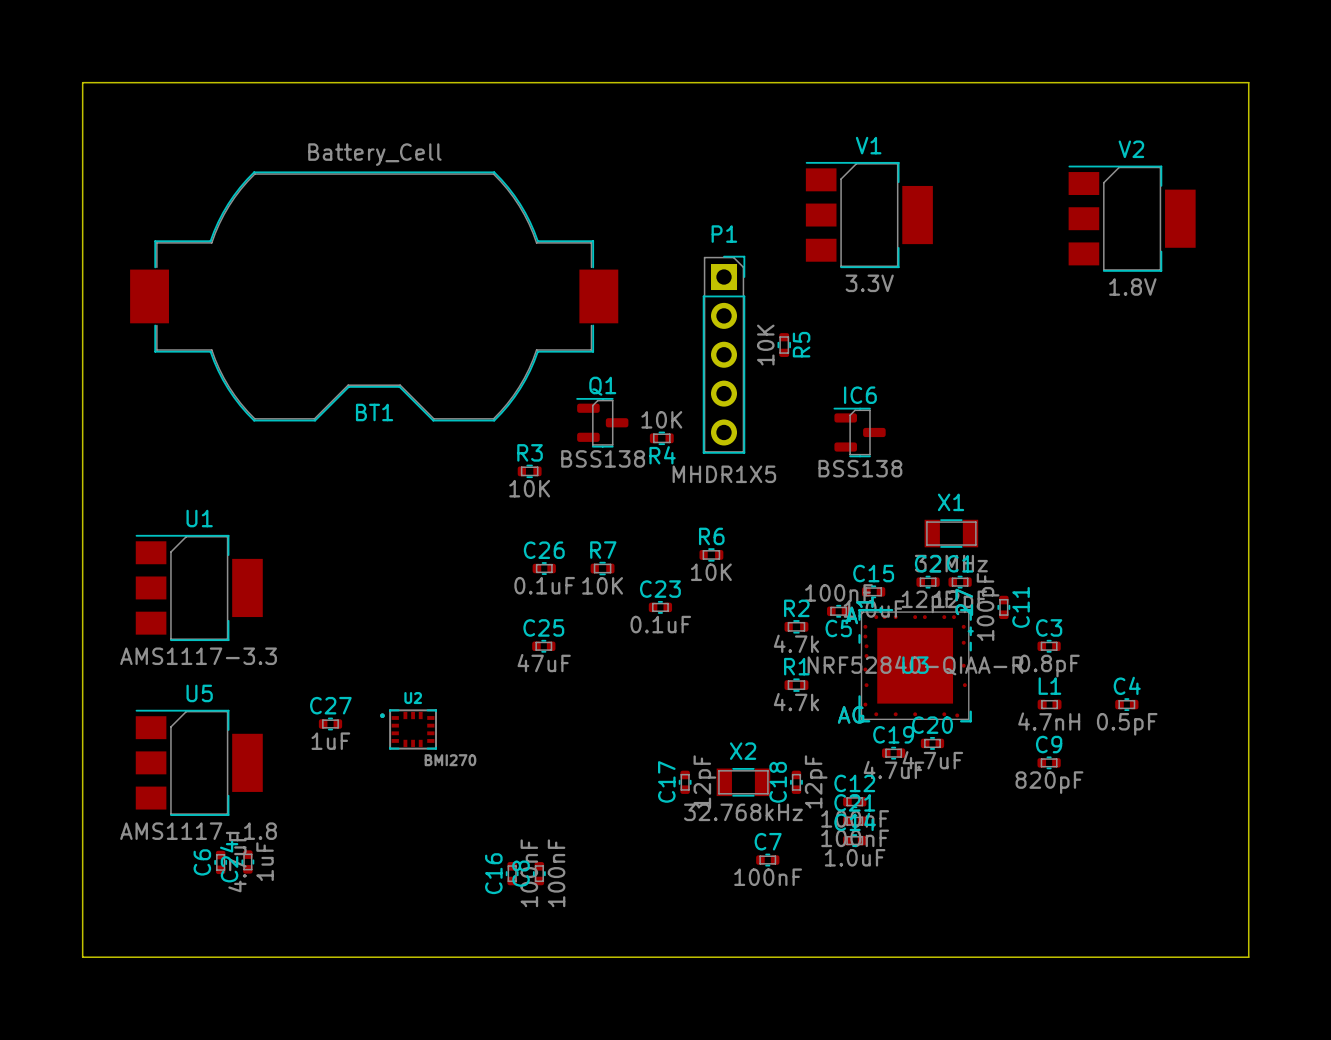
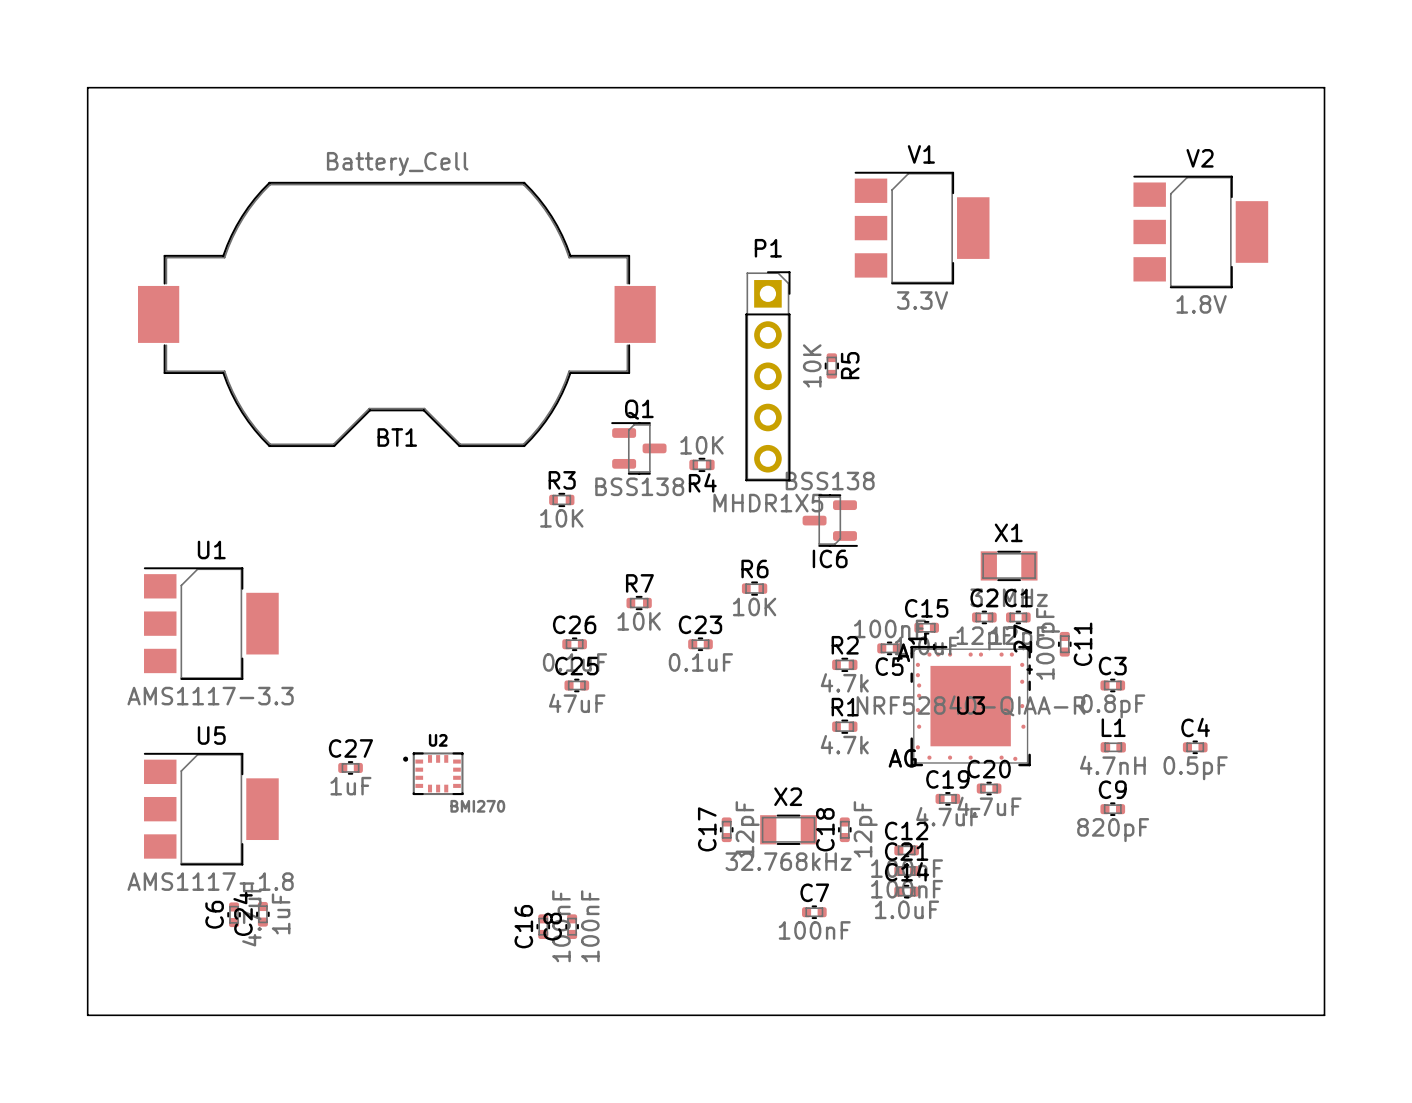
IC6 rotation: 0° (859, 432) -> 180° (830, 520)
IC6 position: (859, 432) -> (830, 520)
C26 position: (544, 568) -> (574, 644)

